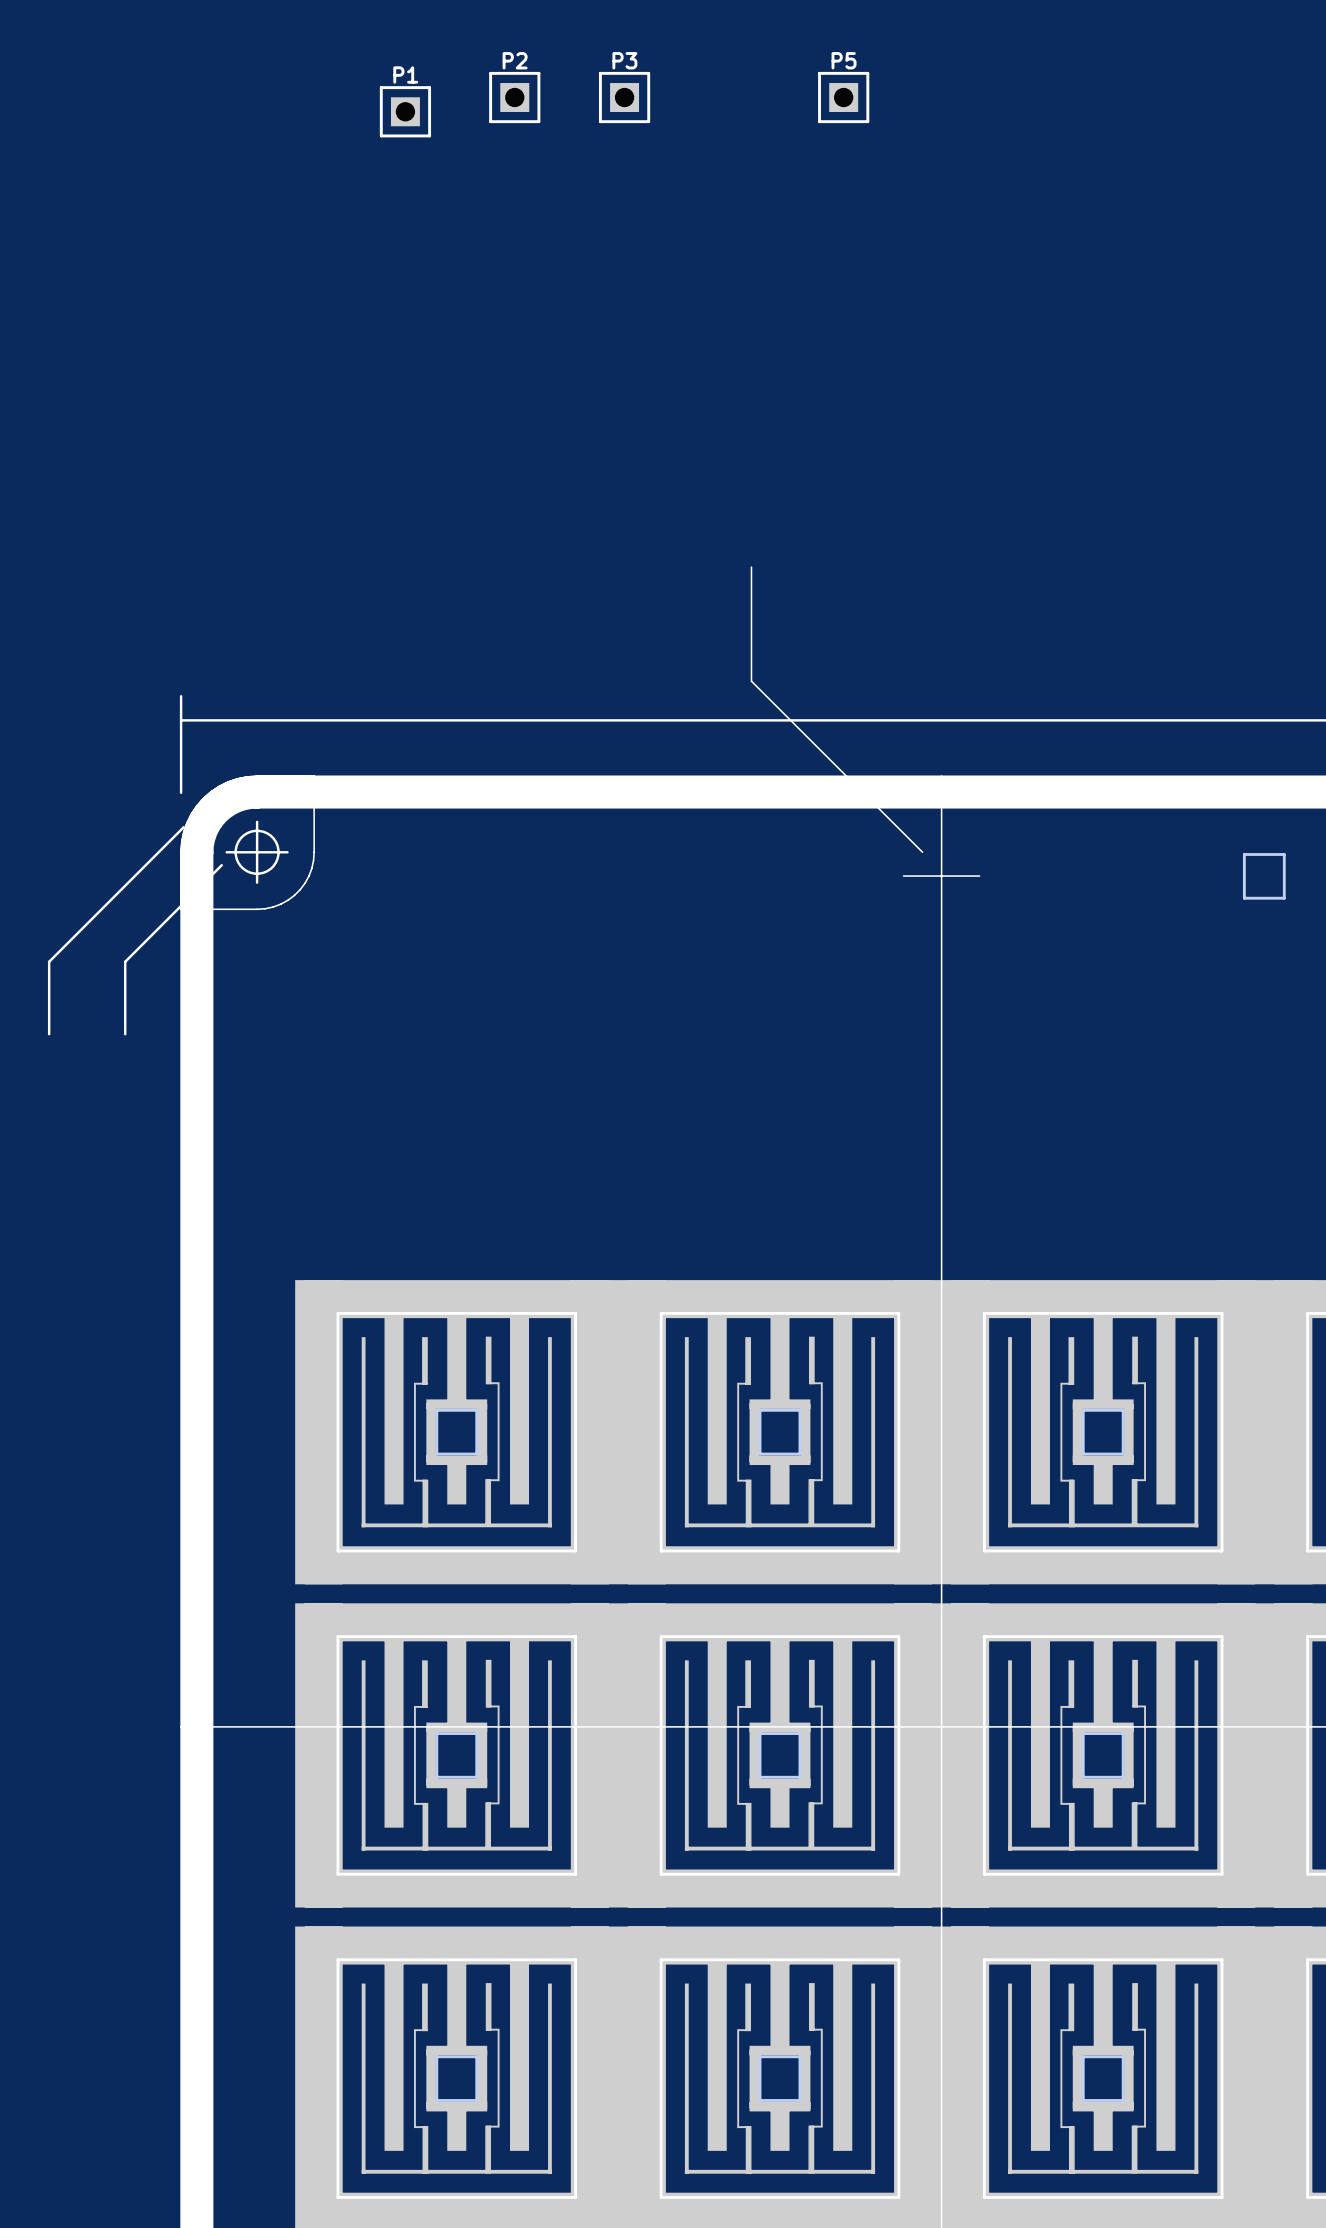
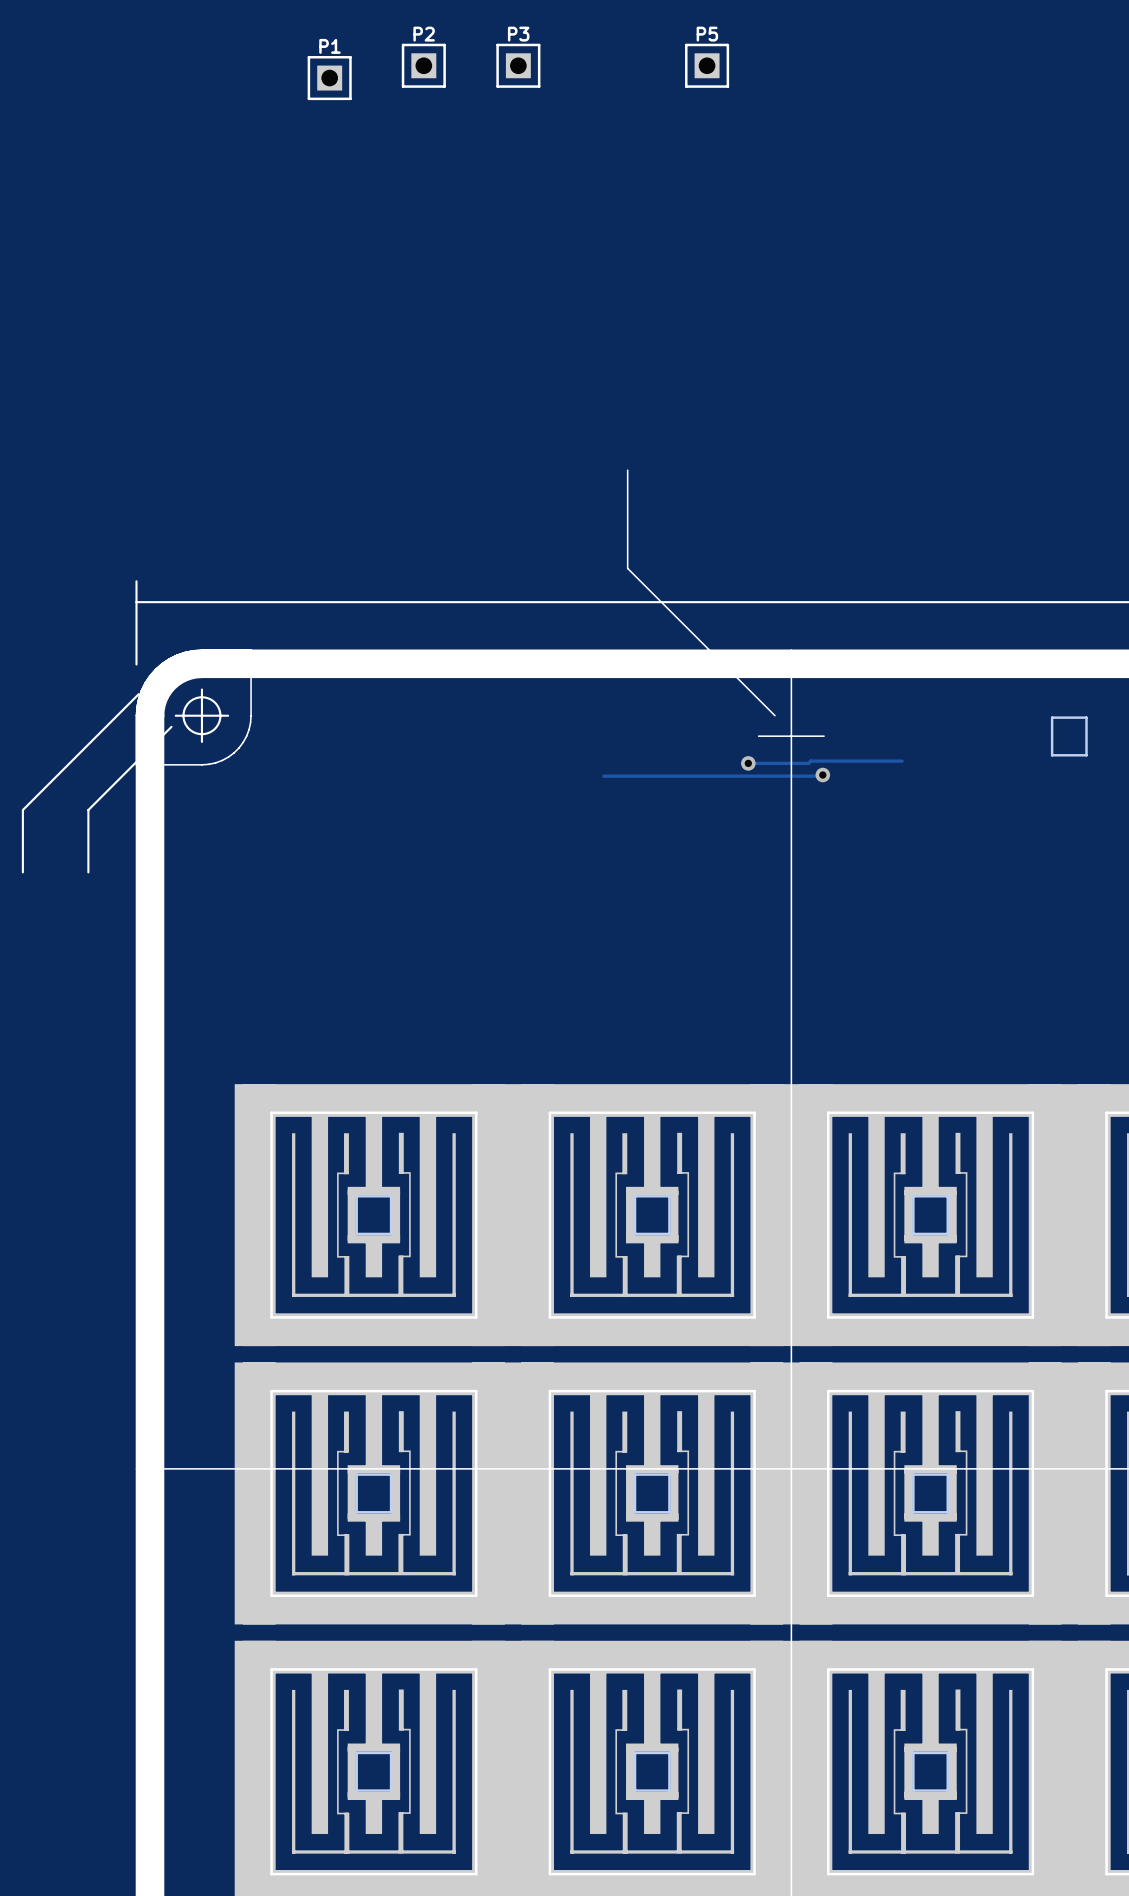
track: none -> (902, 761) (748, 763)
via: none -> (748, 763)
track: none -> (822, 775) (603, 776)
via: none -> (822, 775)

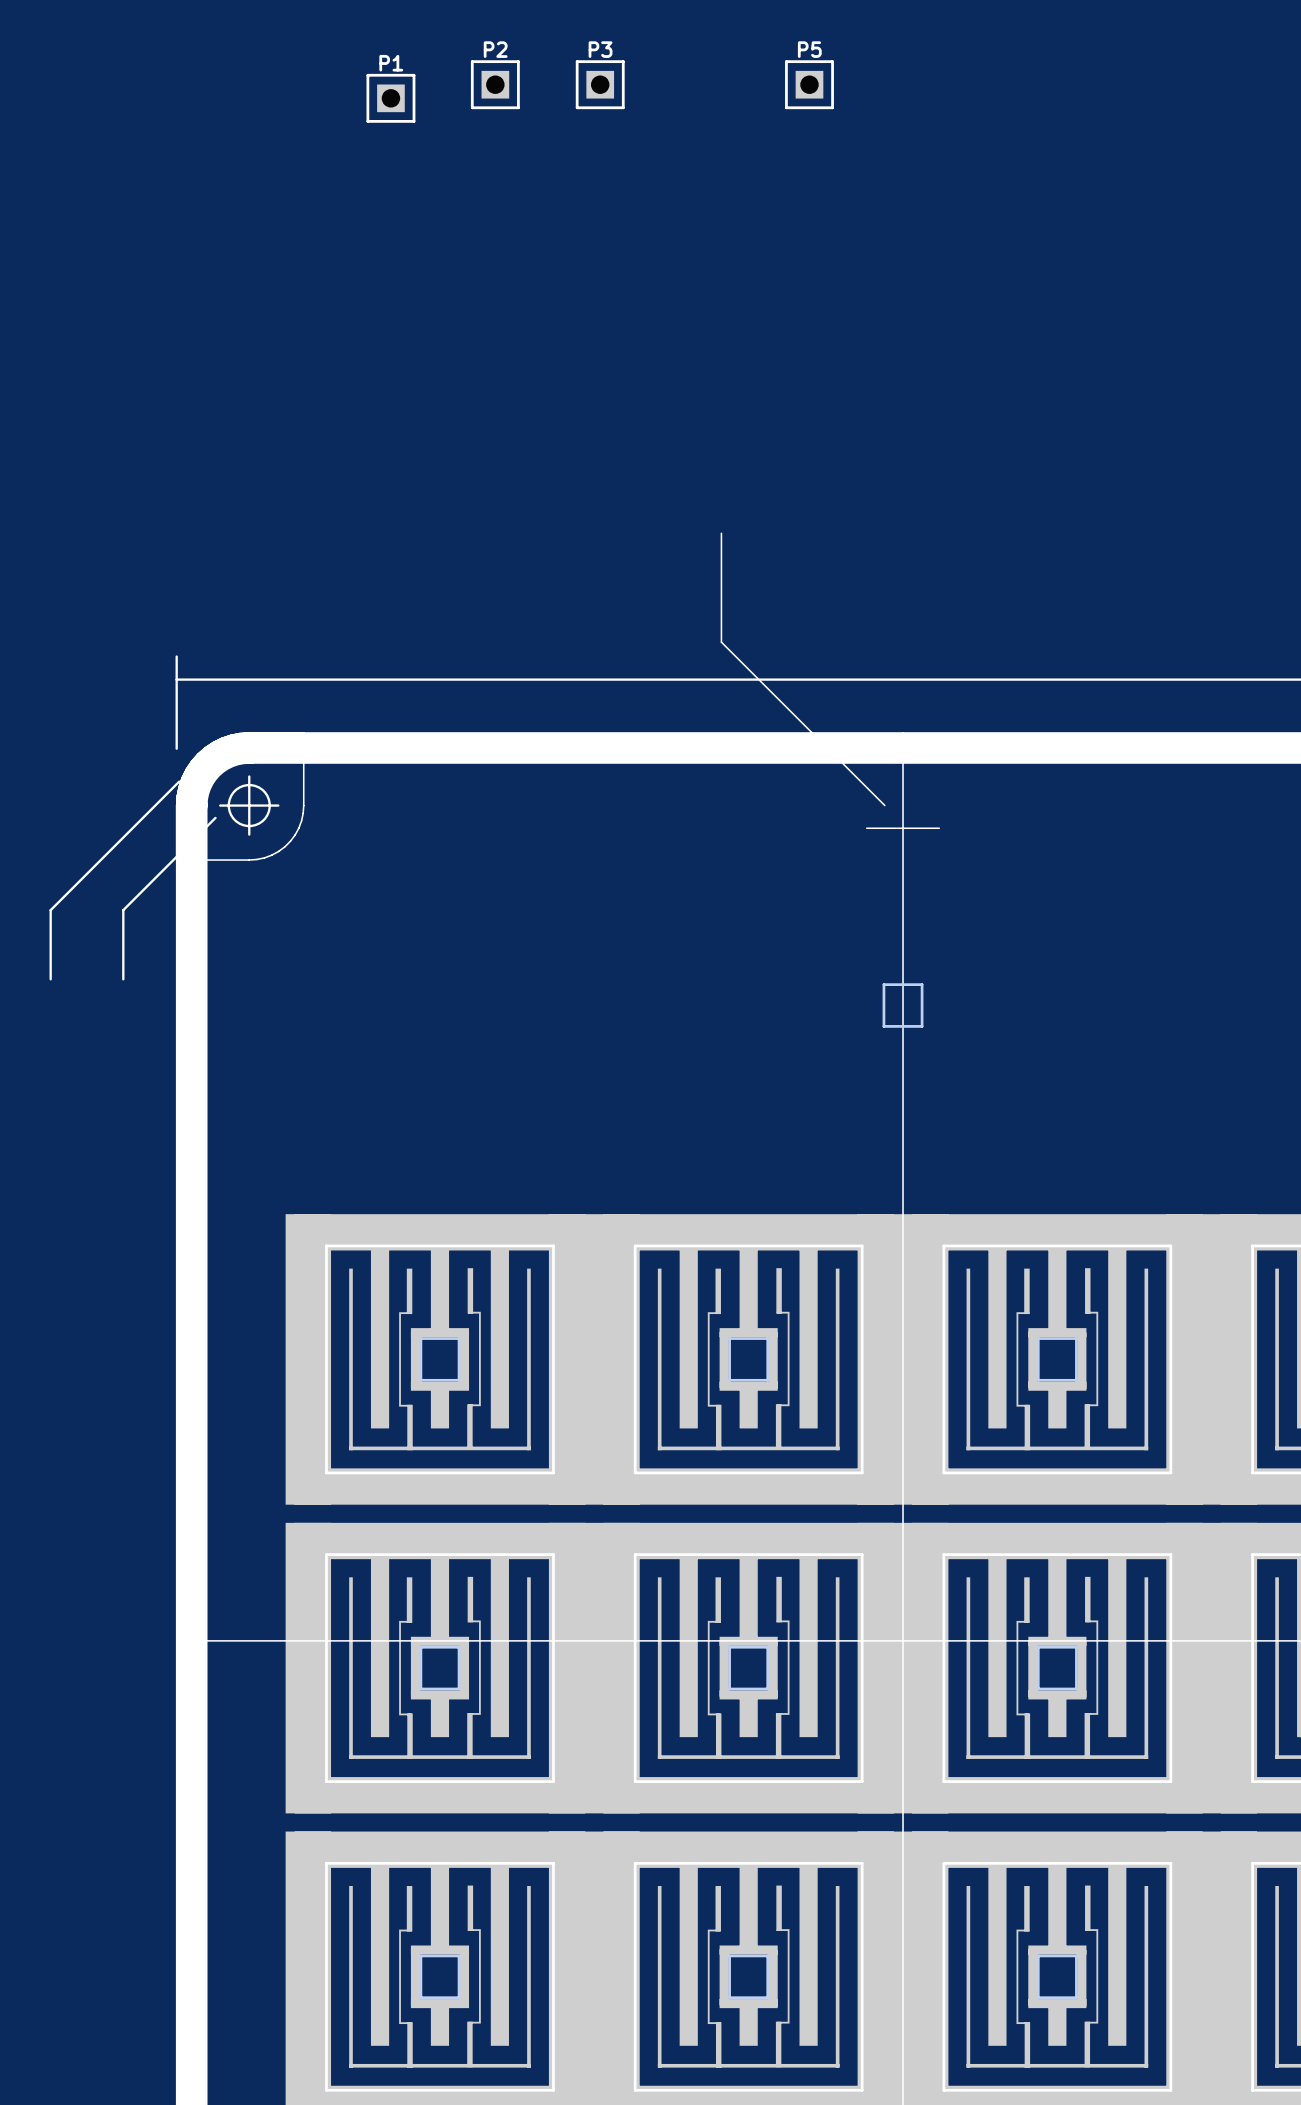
part position: (1069, 736) -> (903, 1005)
track: (902, 761) (748, 763) -> none
via: (748, 763) -> none
track: (822, 775) (603, 776) -> none
via: (822, 775) -> none

